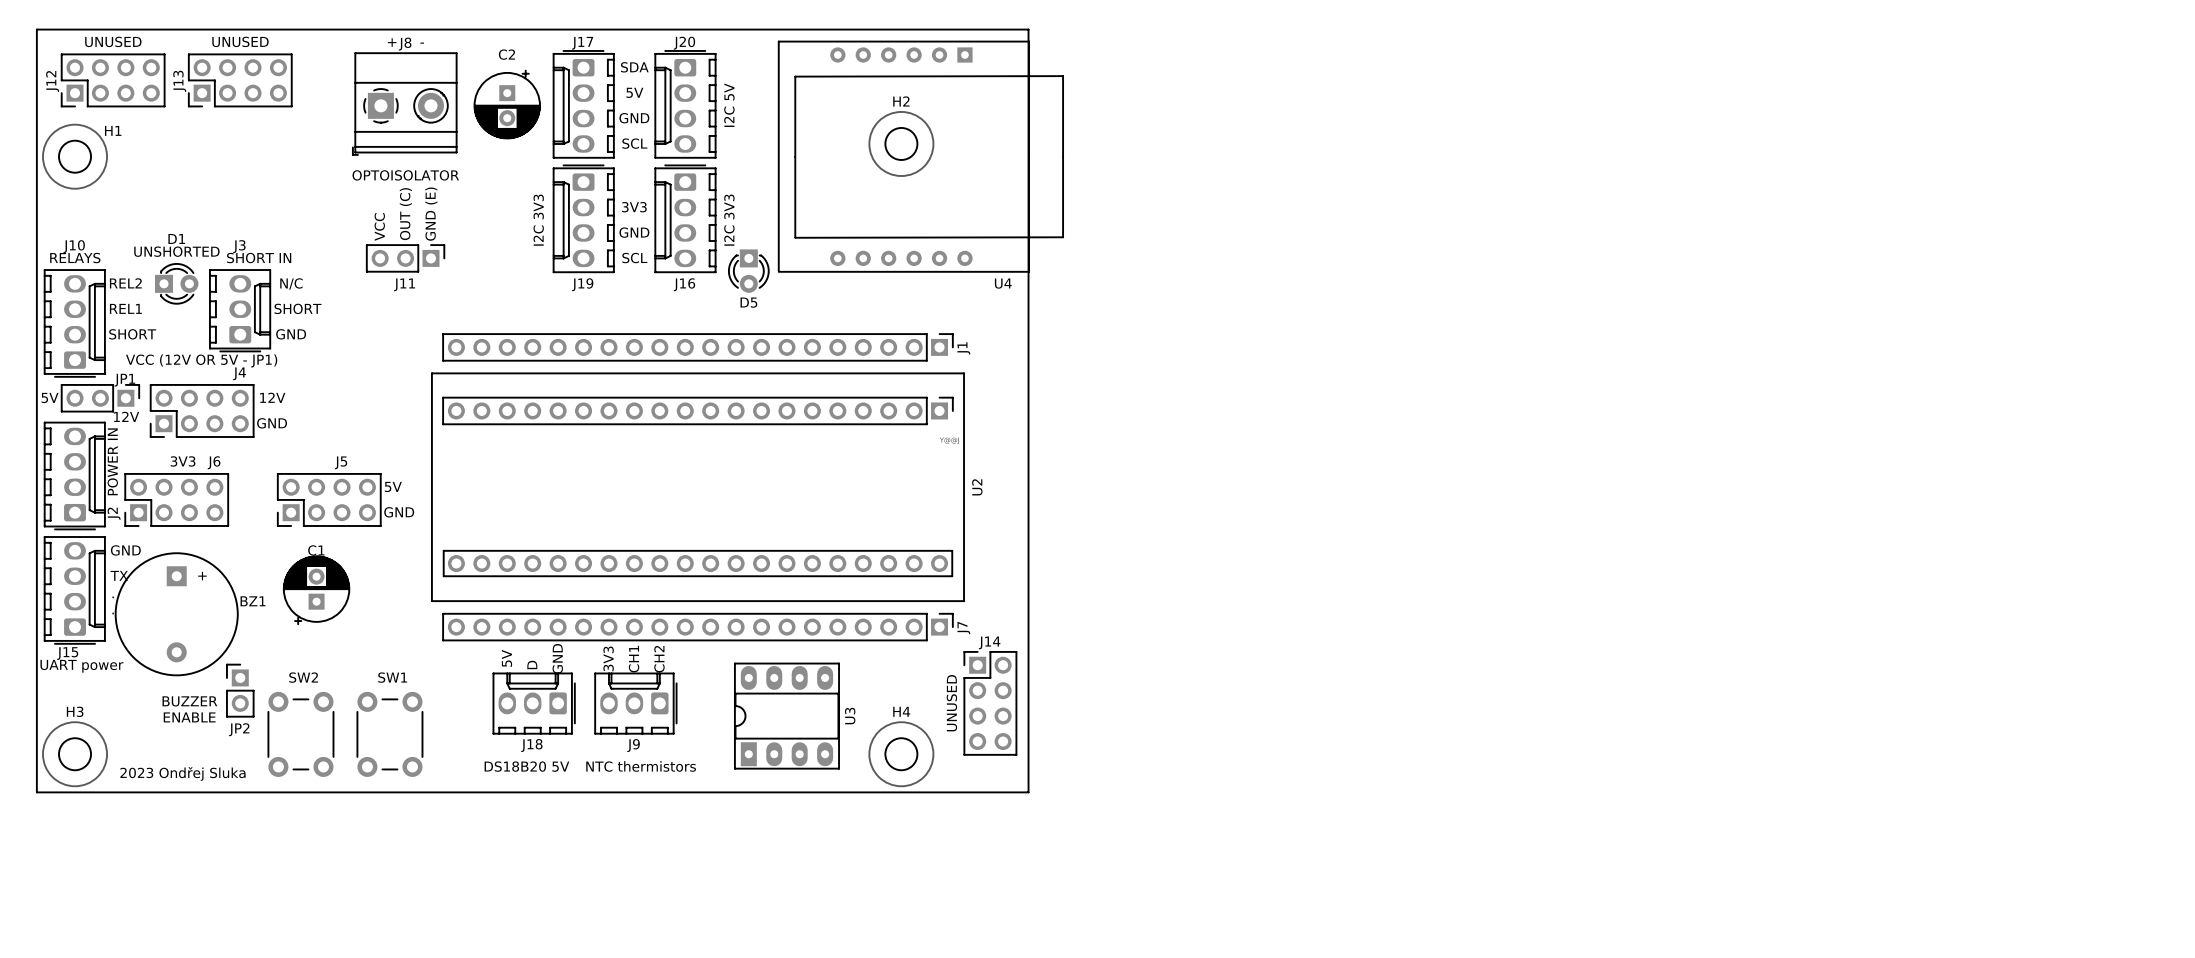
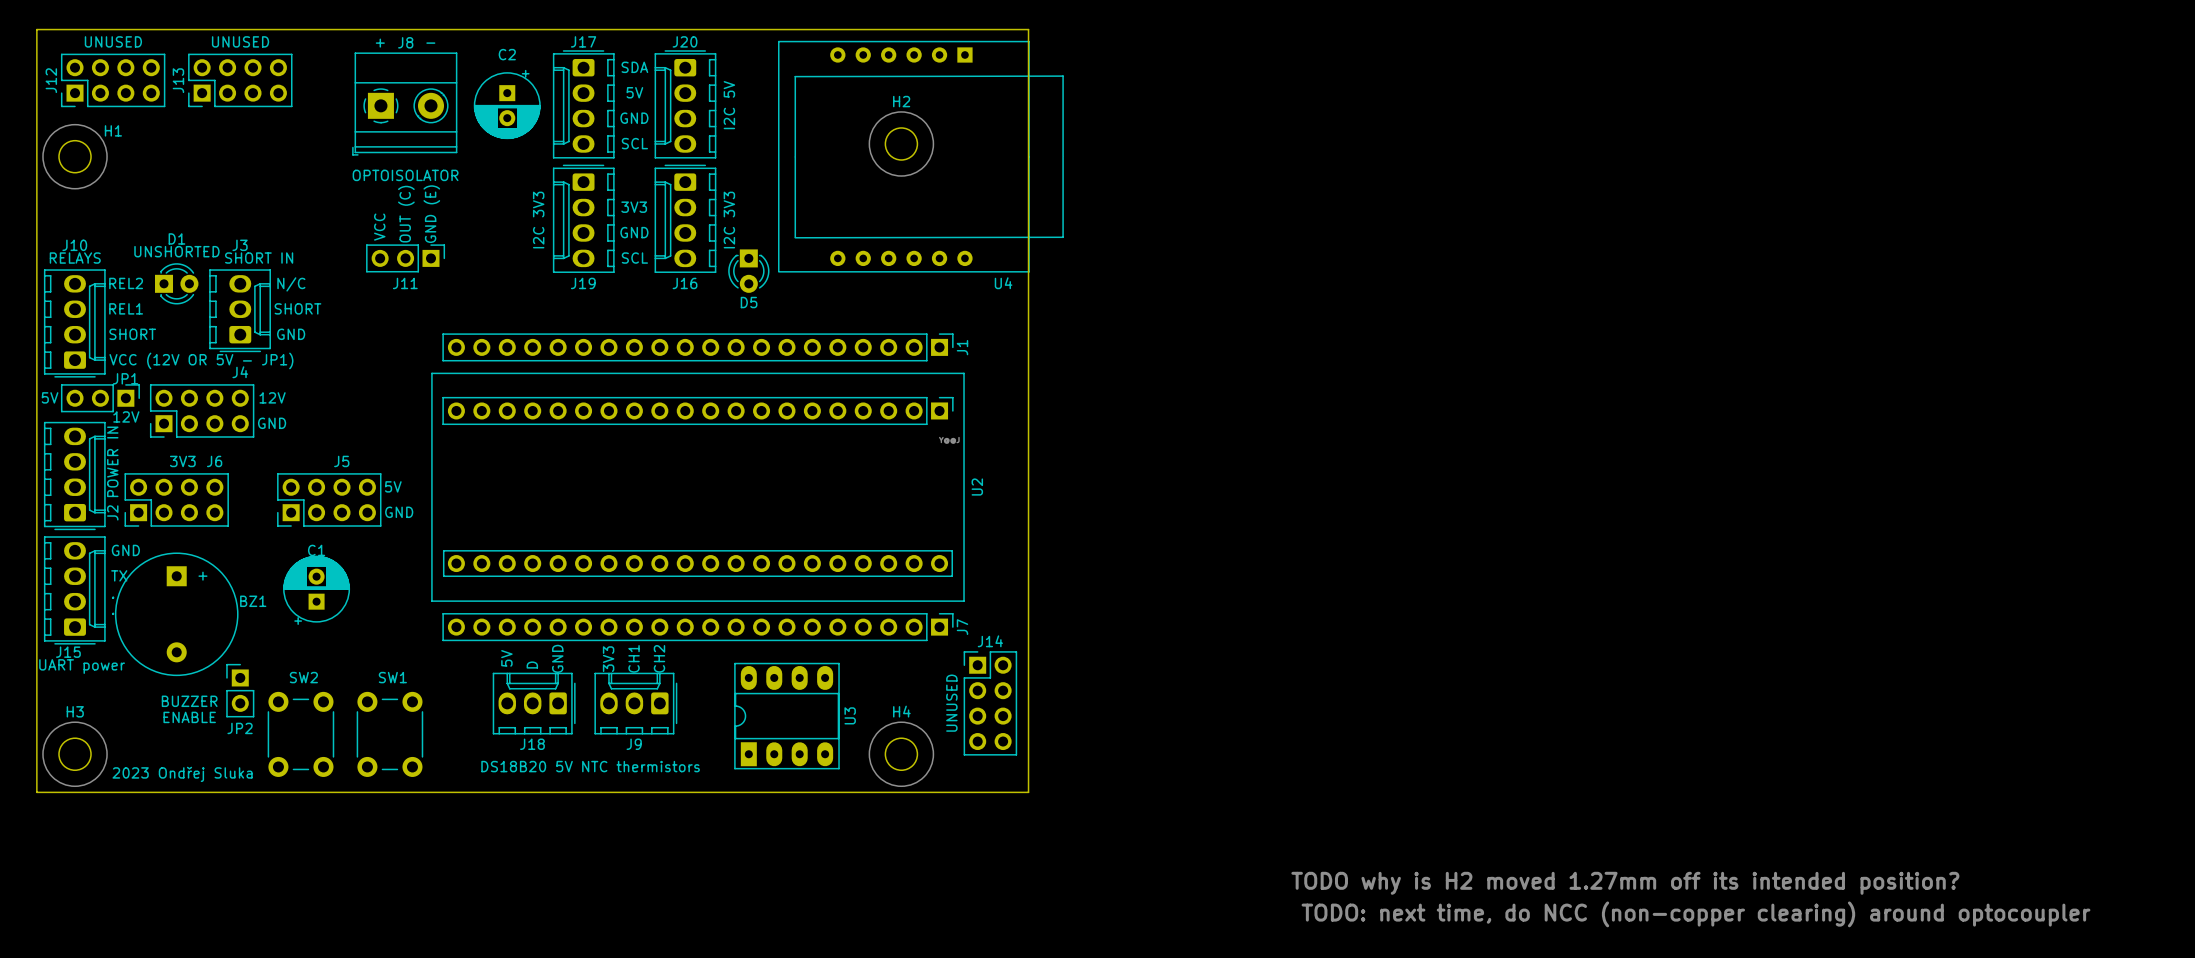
text: none -> TODO why is H2 moved 1.27mm off its intended position? (1625, 883)
text: none -> TODO: next time, do NCC (non-copper clearing) around optocoupler (1695, 914)

